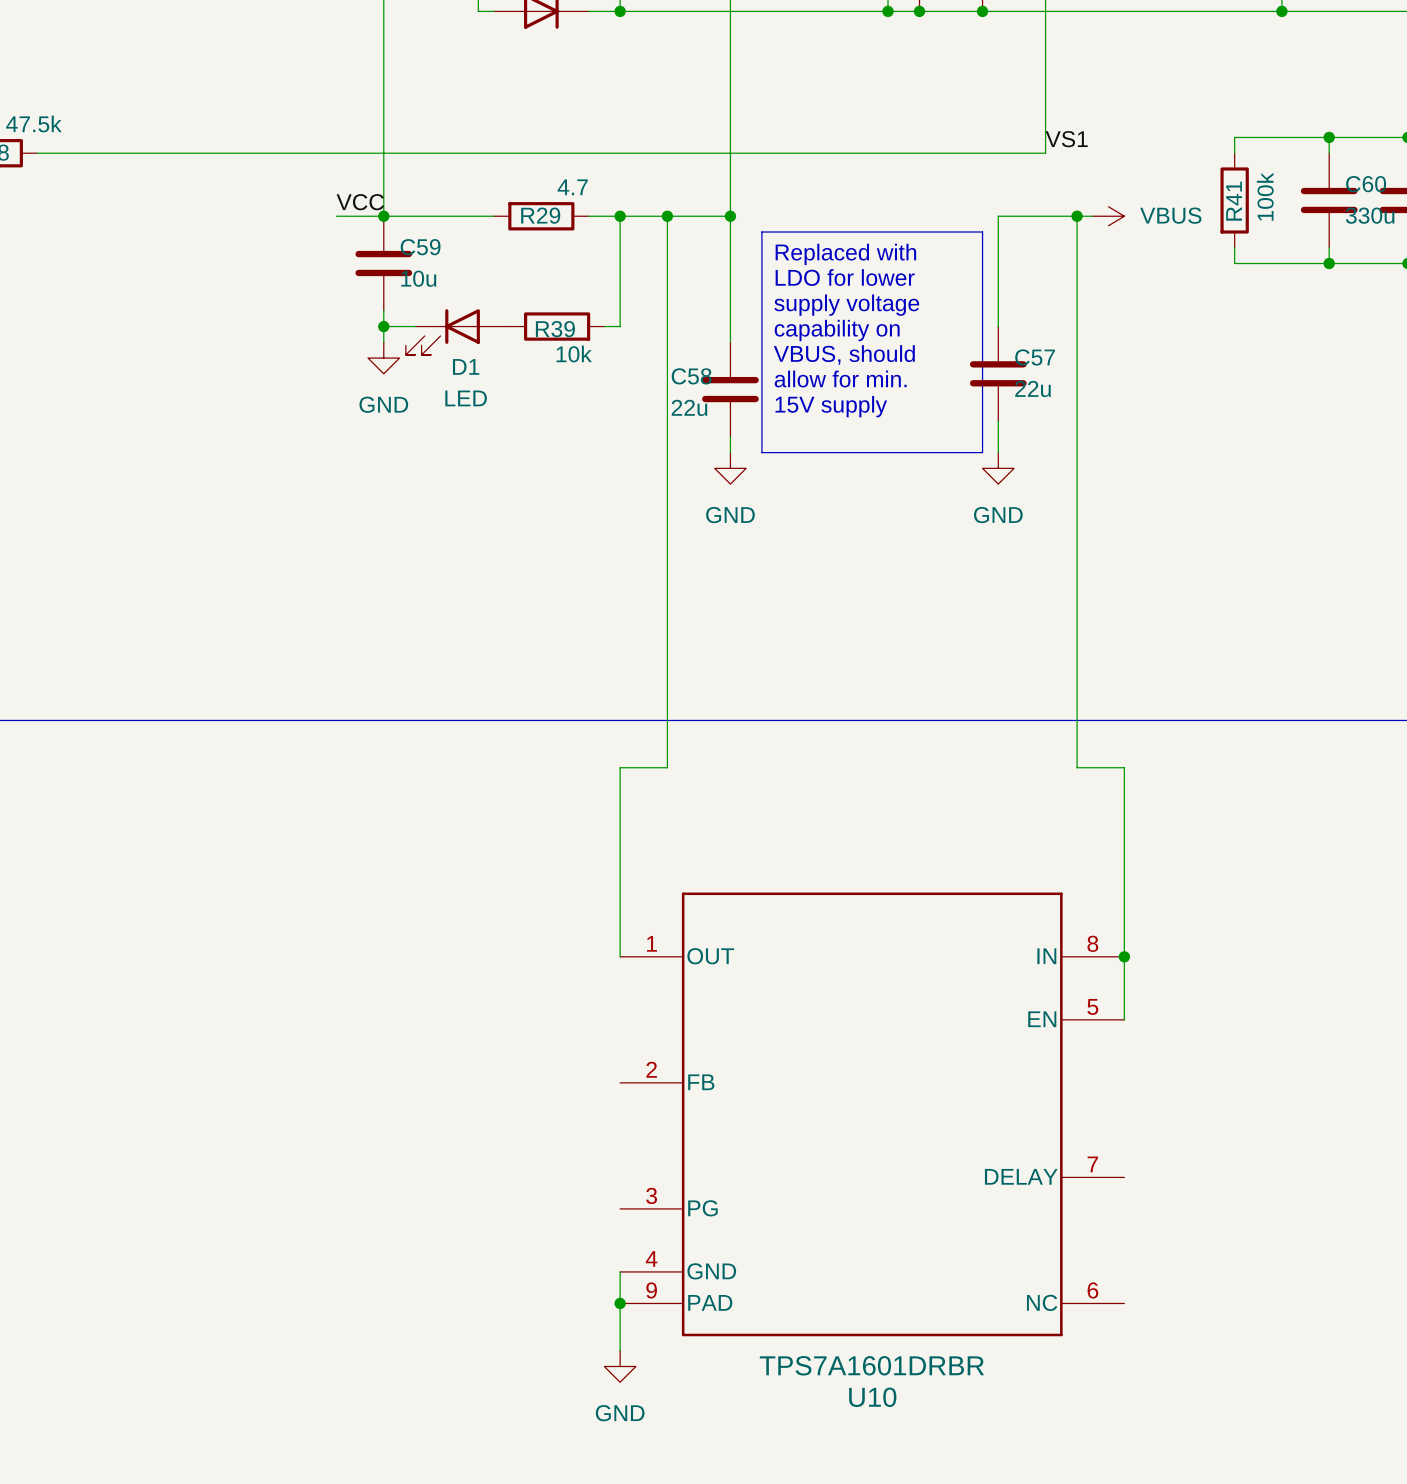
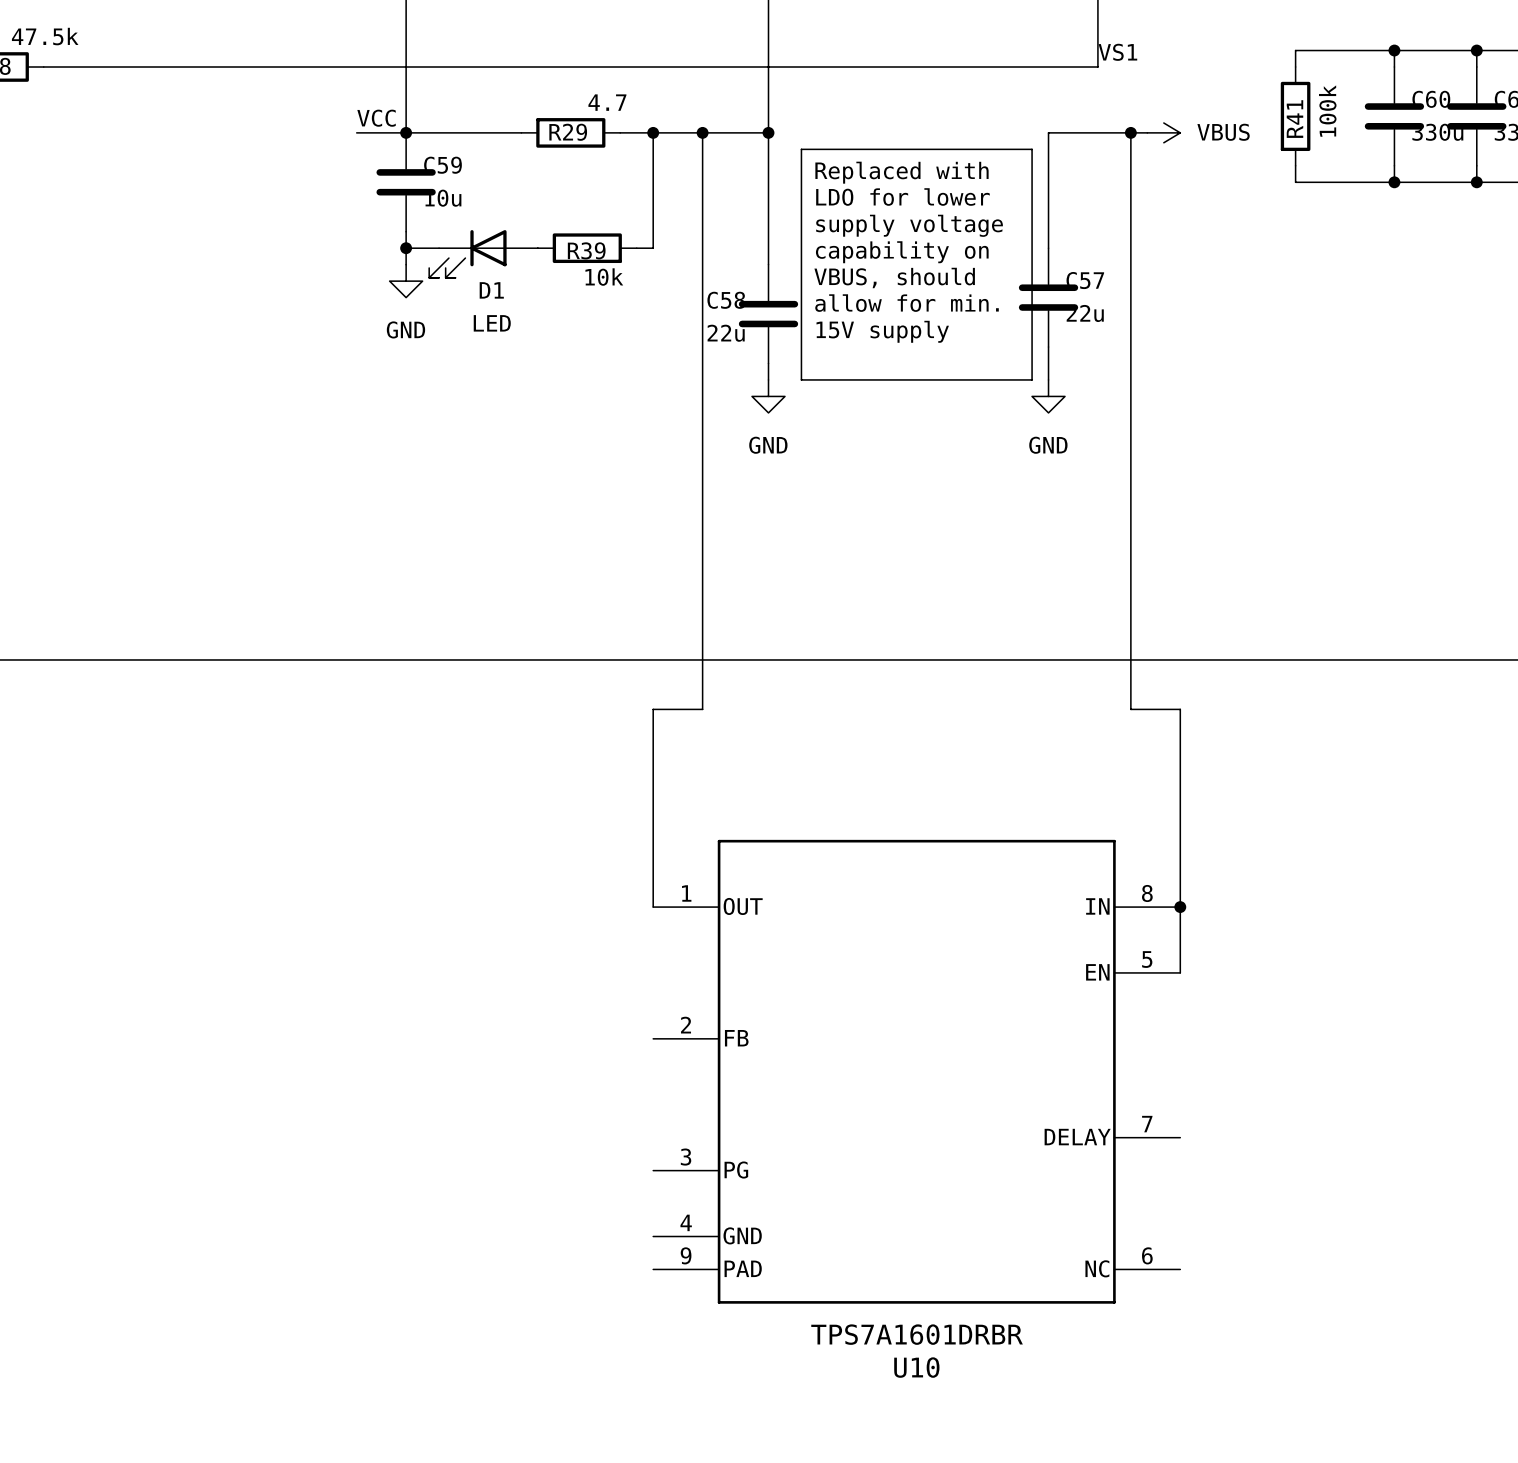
wire: (620, 1271) (620, 1350) -> none
junction: (620, 1303) -> none
power symbol: GND (620, 1366) -> none

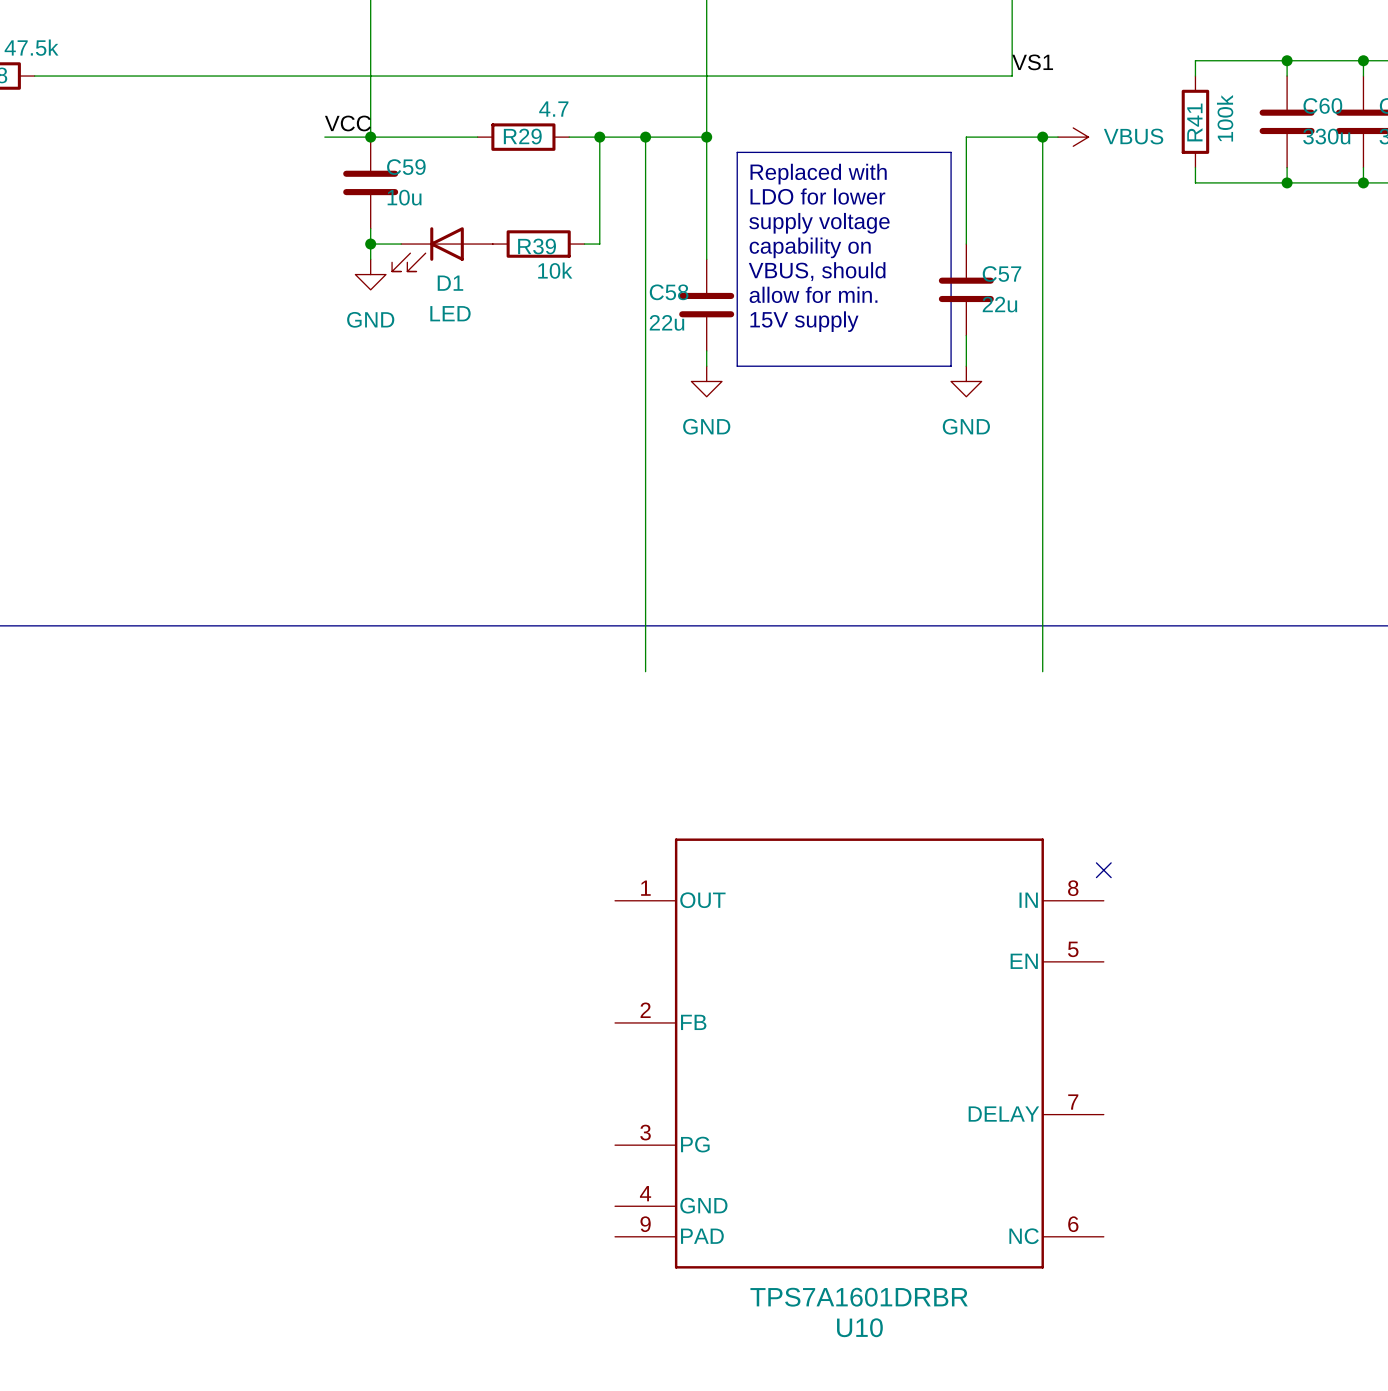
wire: (702, 709) (653, 709) (653, 907) -> none
wire: (1130, 709) (1180, 709) (1180, 972) -> none
junction: (1180, 907) -> none
no-connect mark: none -> (1103, 870)
U10 position: (916, 1071) -> (859, 1053)

